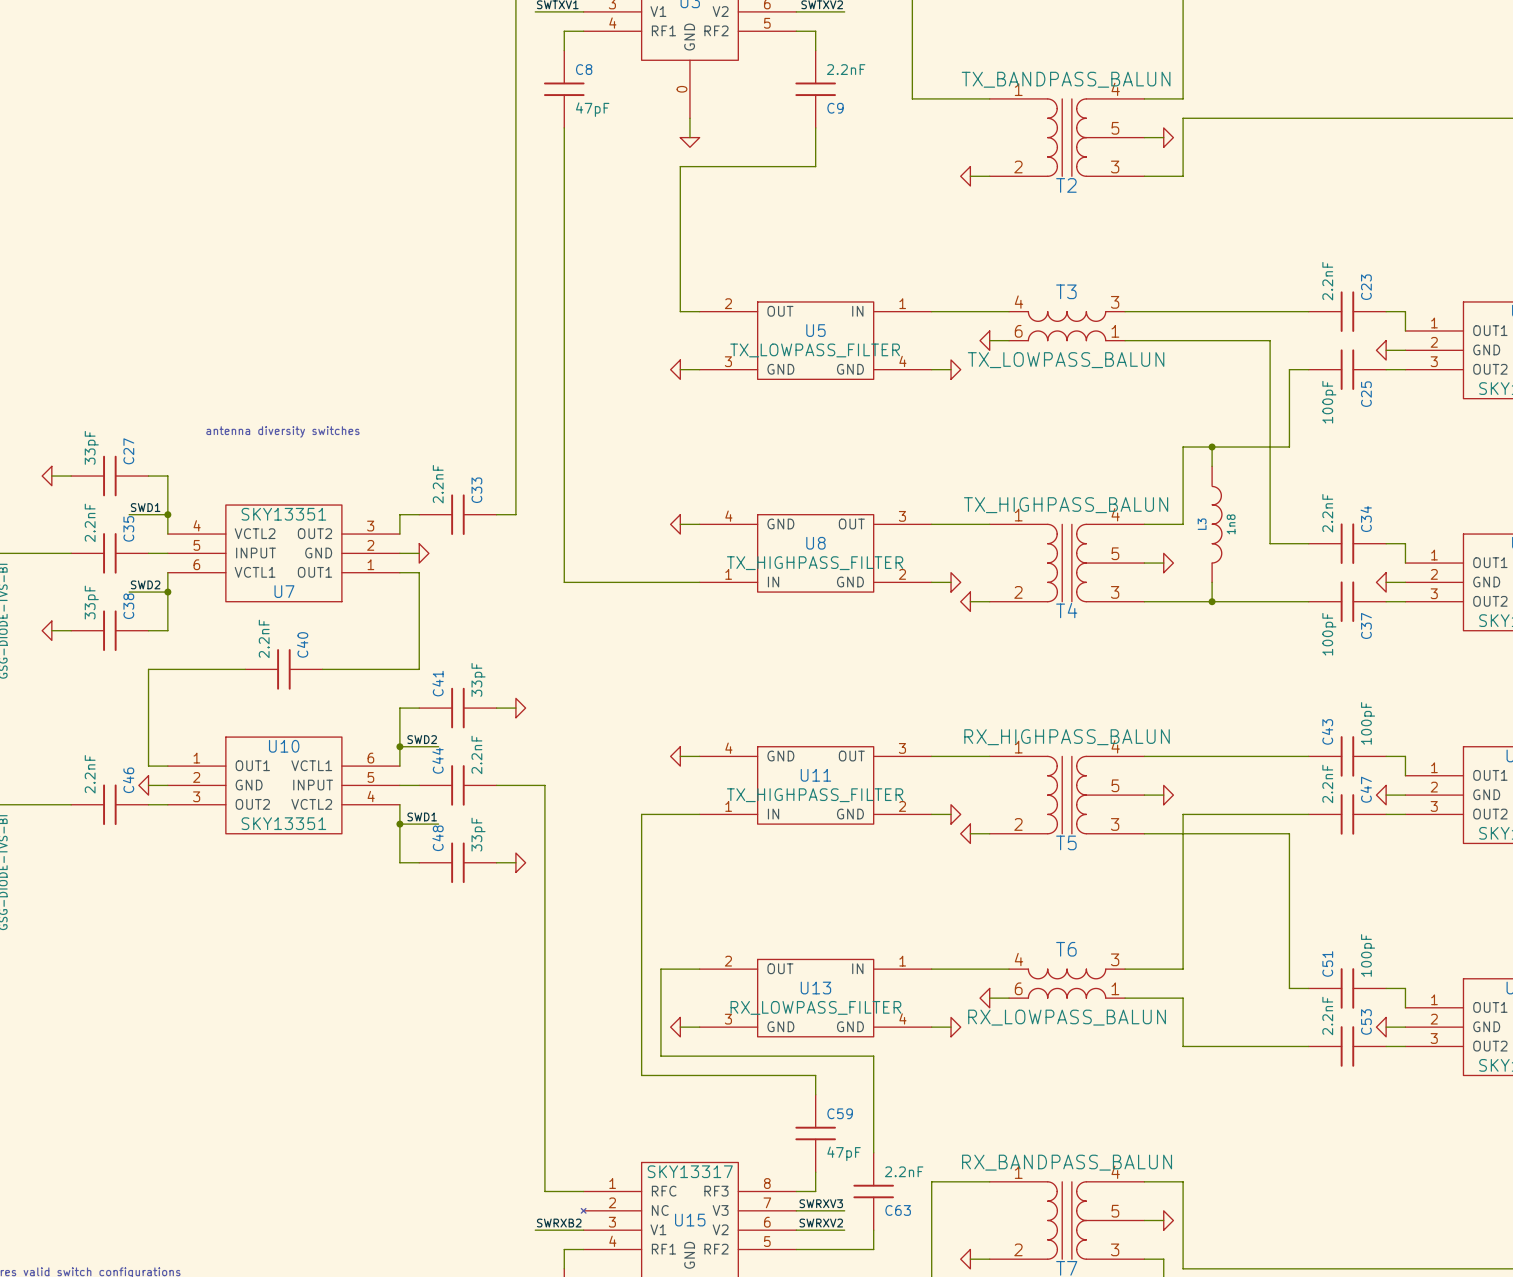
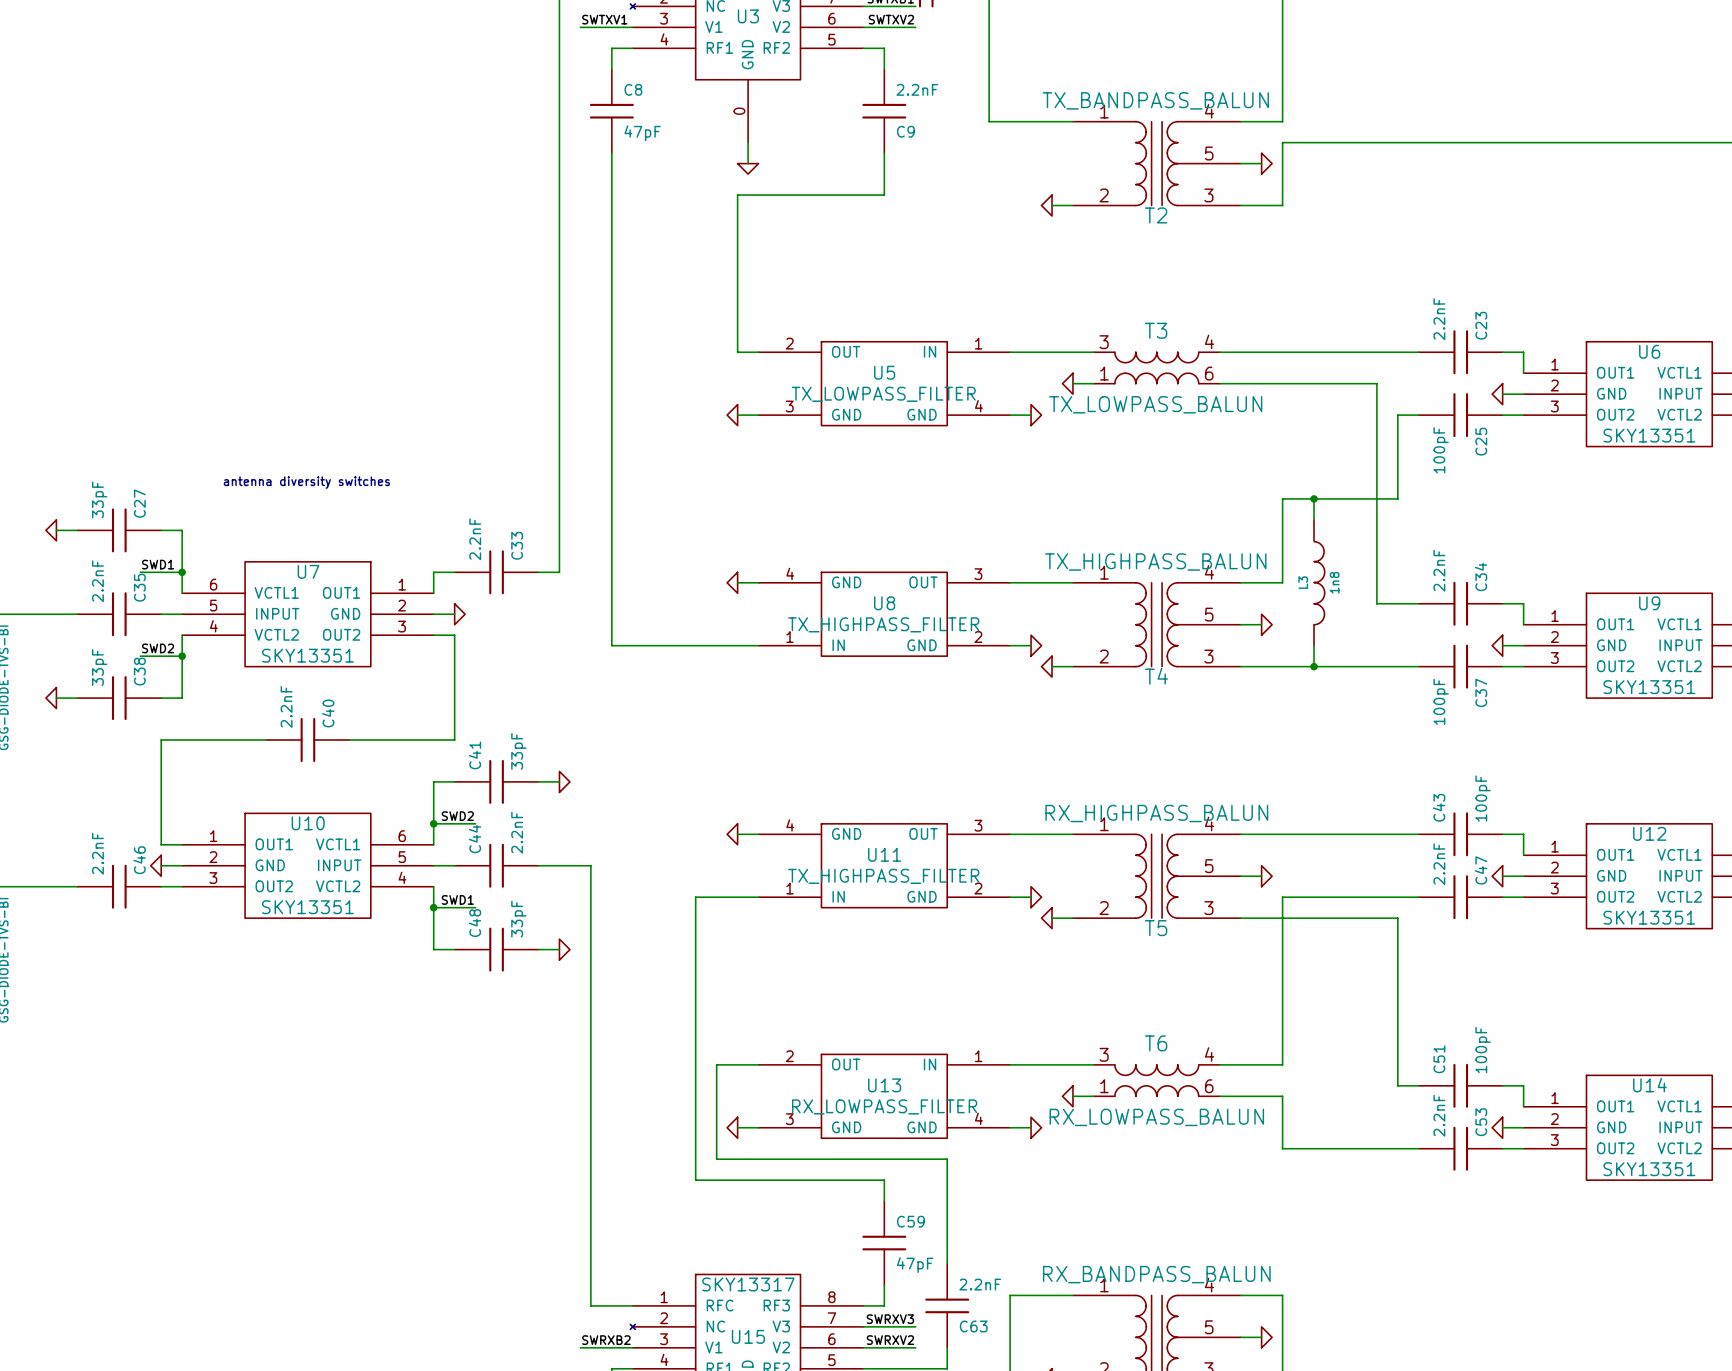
T3 flip: as is (1067, 326) -> left-right (1156, 367)
U7 flip: as is (283, 553) -> up-down (307, 614)
T6 flip: as is (1067, 983) -> left-right (1156, 1080)

